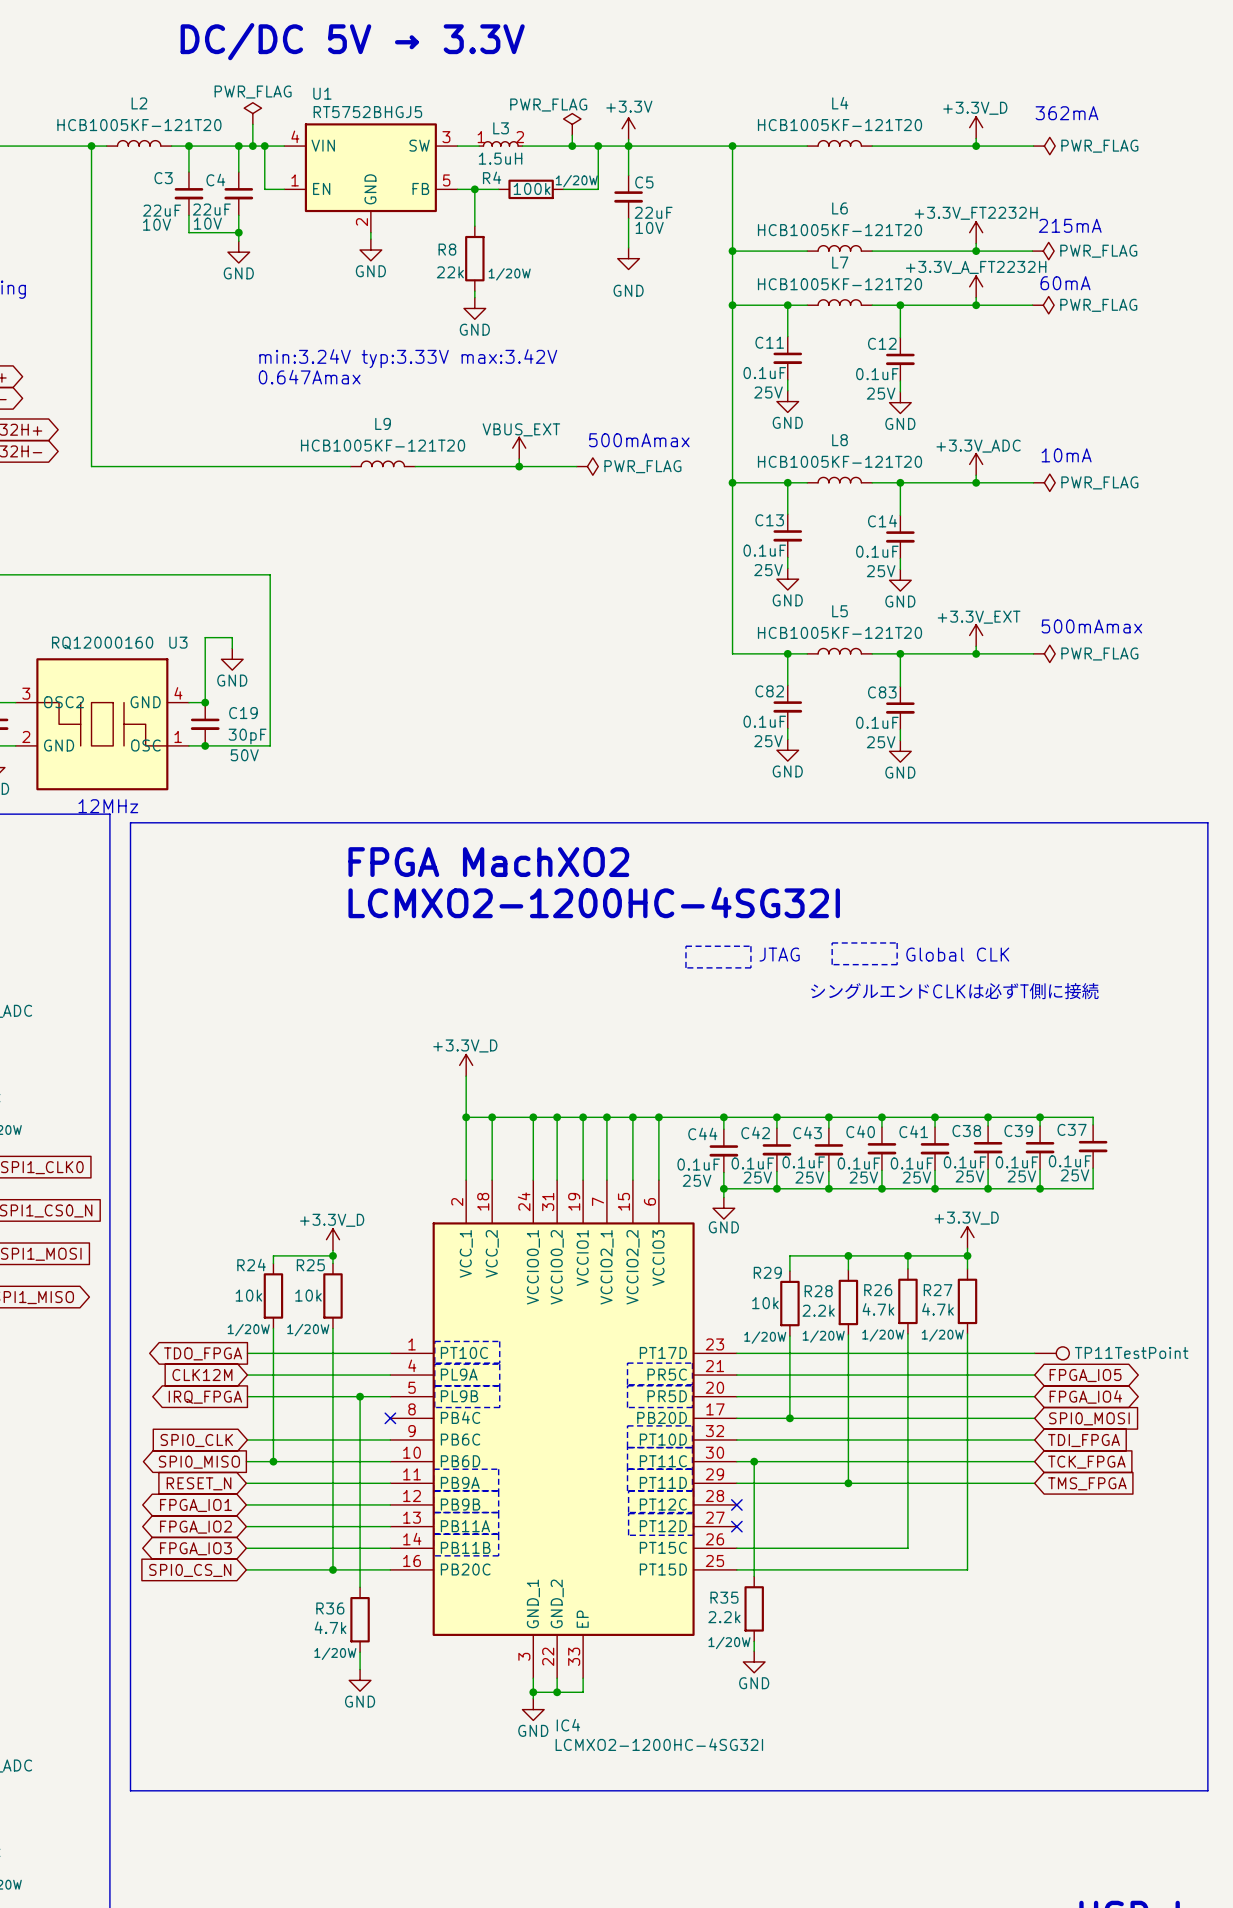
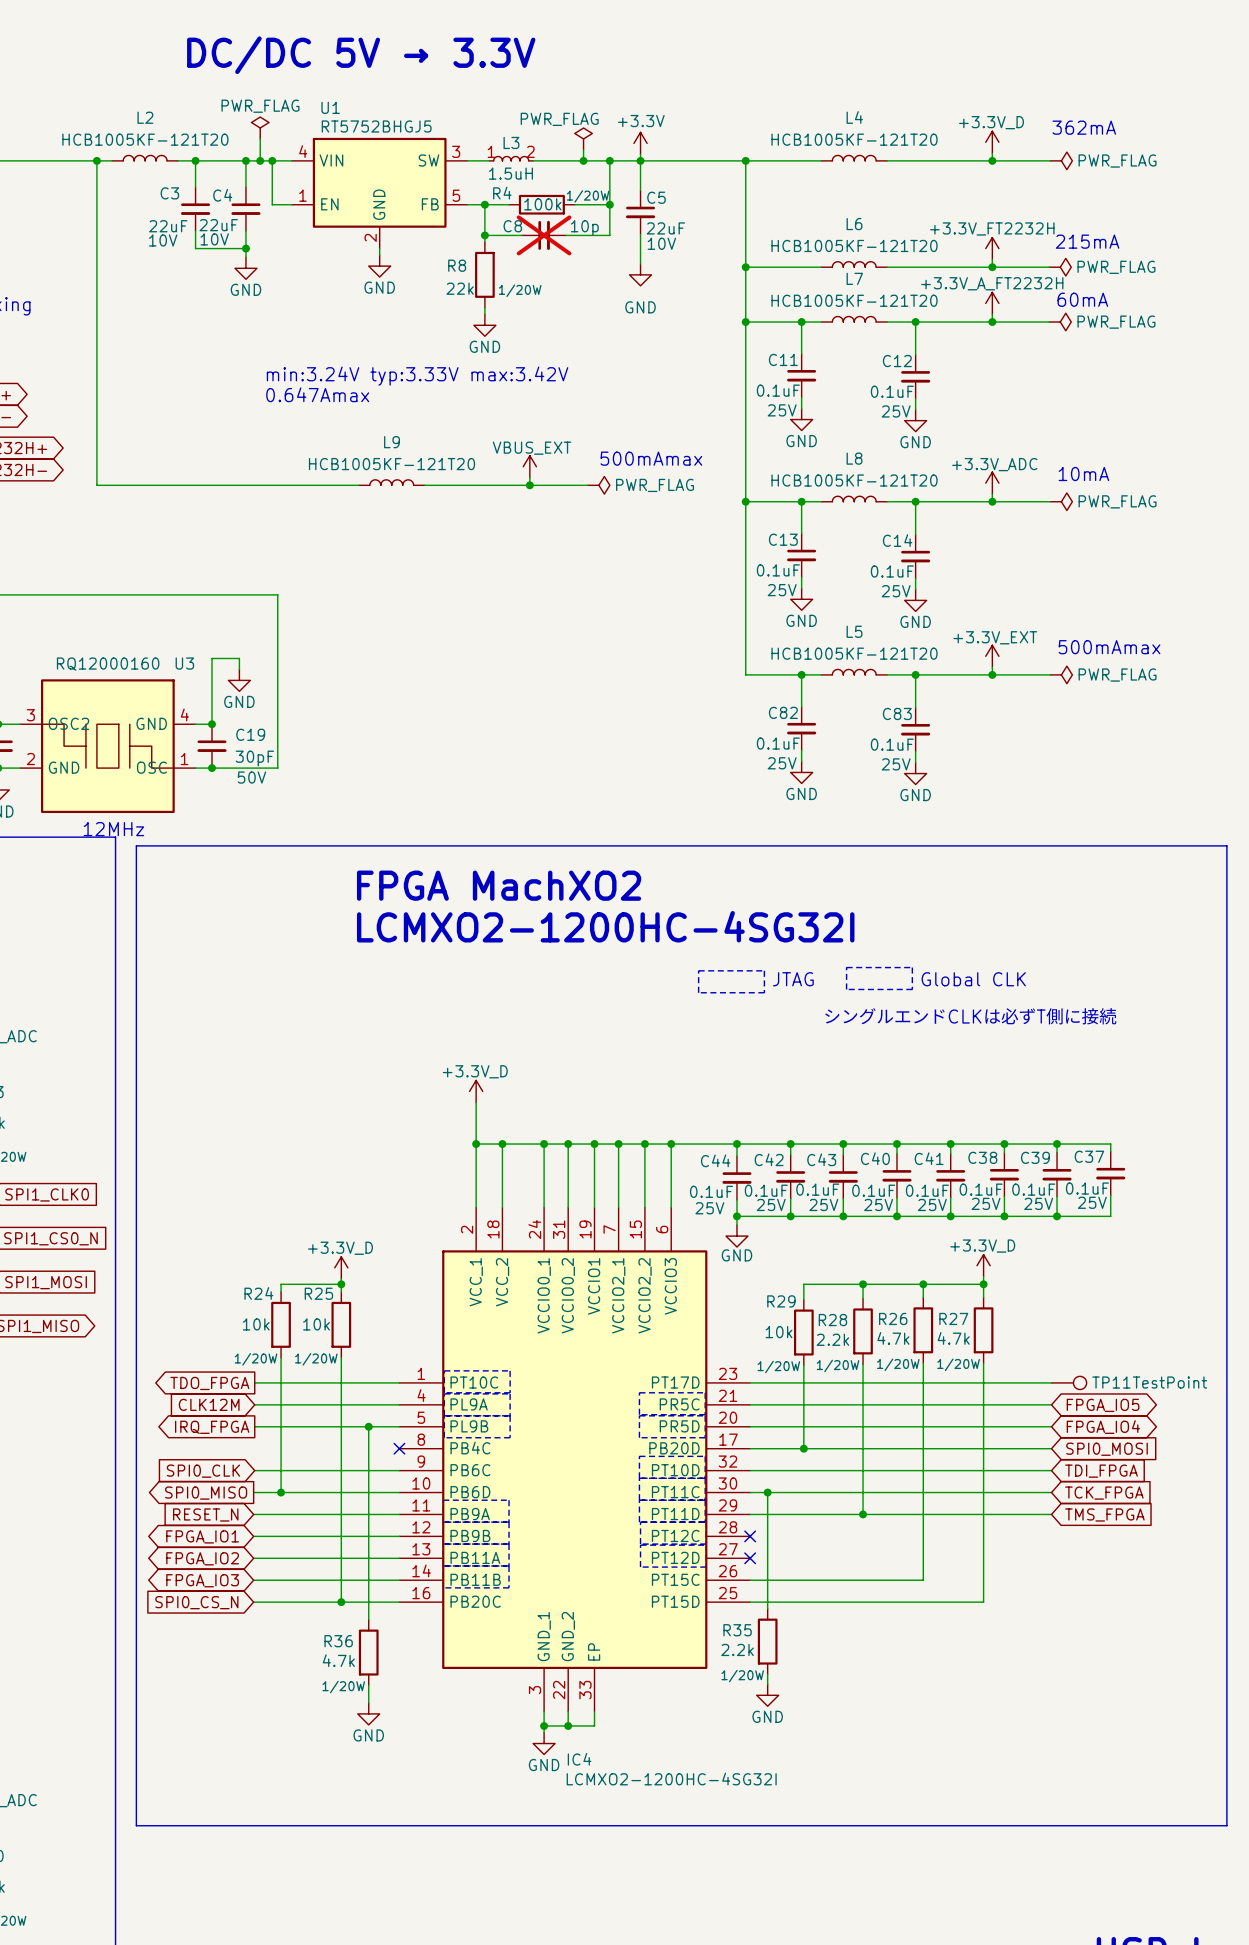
wire: none -> (609, 204) (609, 235) (566, 235)
junction: none -> (609, 204)
wire: none -> (484, 235) (522, 235)
junction: none -> (484, 235)
C8: none -> 10p (544, 235)

